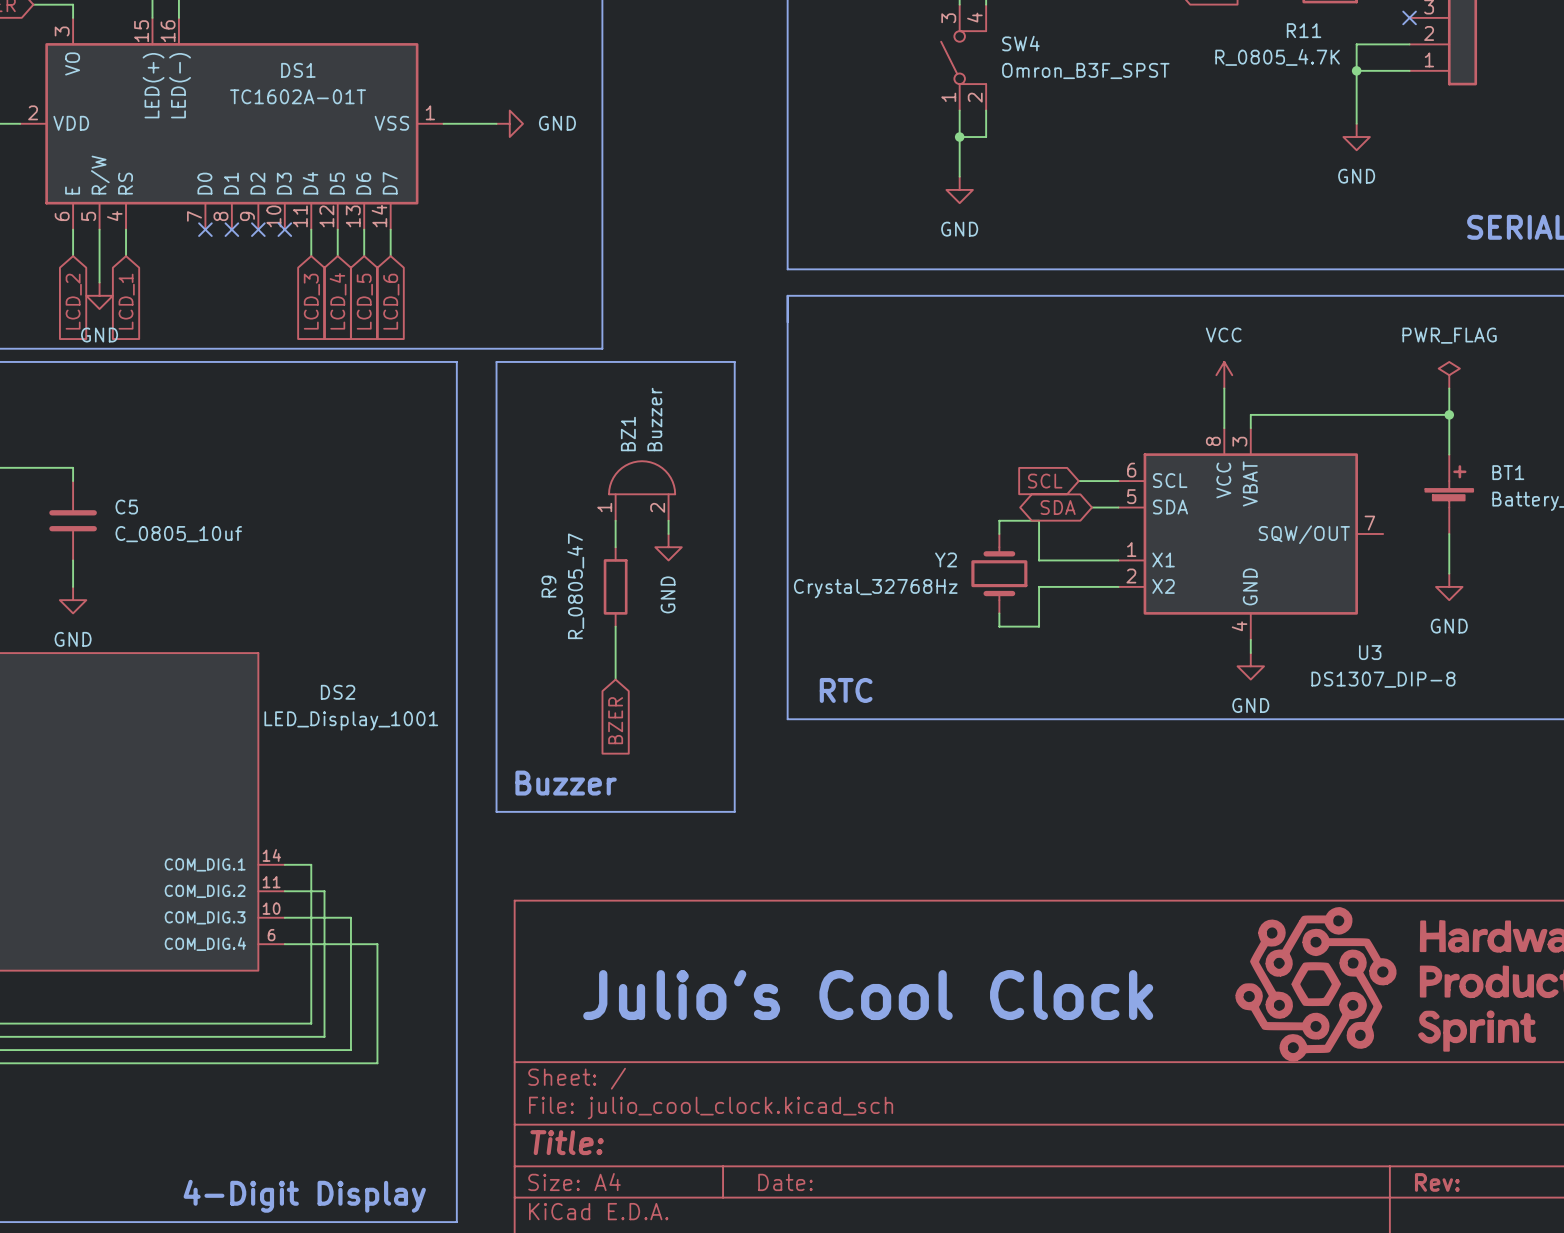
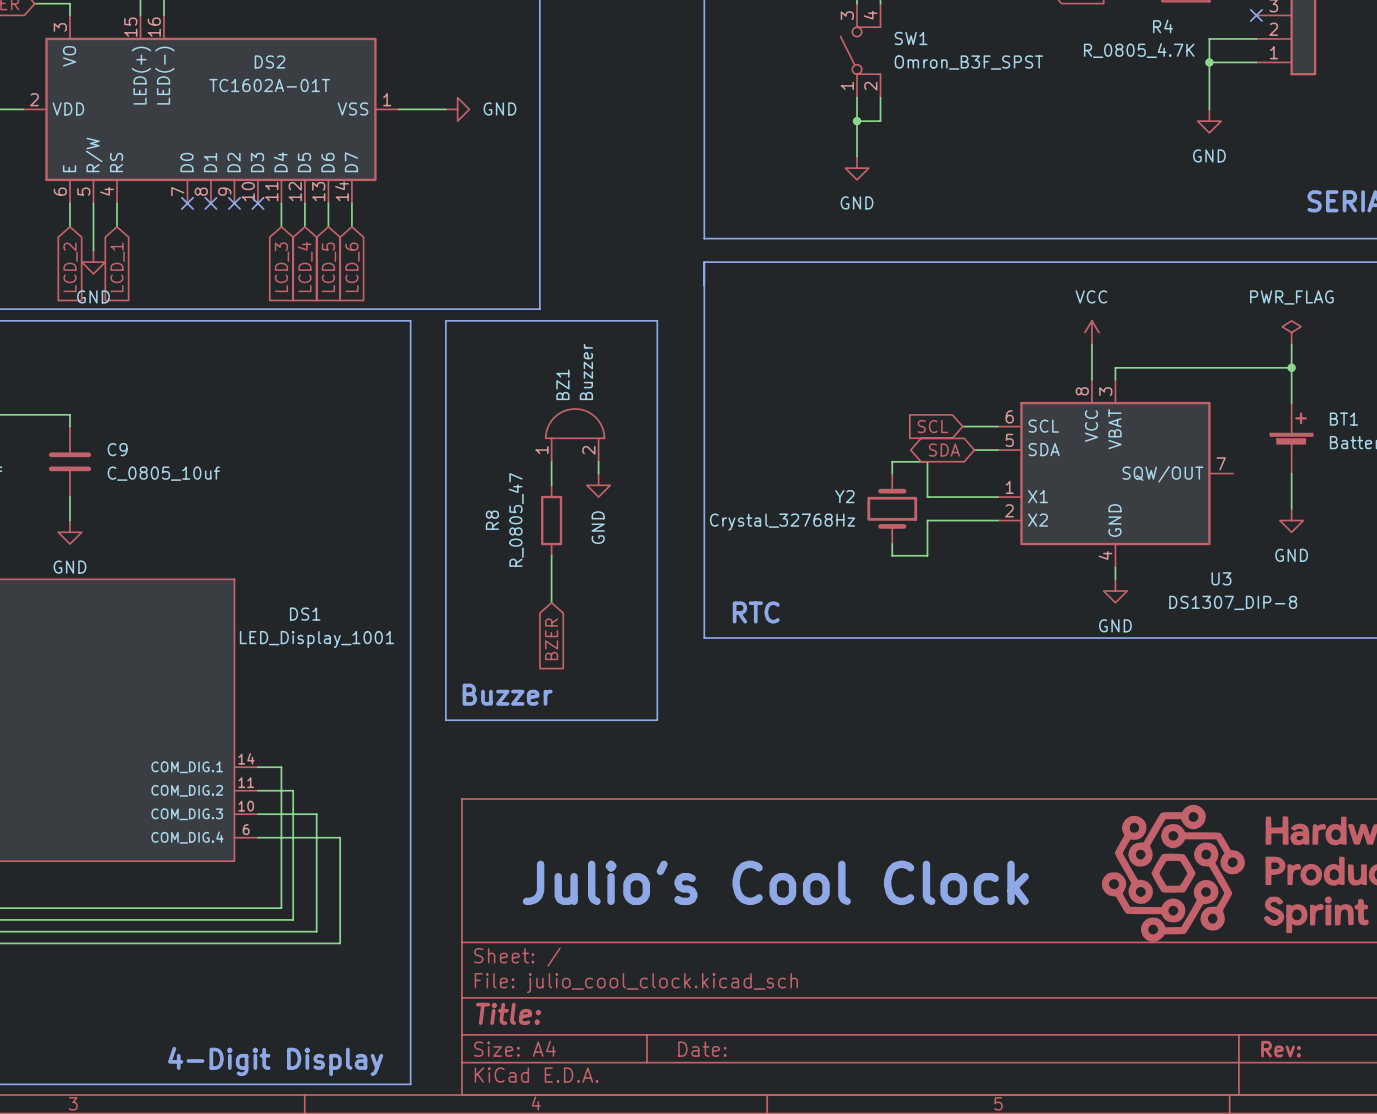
R11 name: R11 (1304, 30) -> R4 (1162, 26)
SW4 name: SW4 (1020, 43) -> SW1 (911, 38)
DS1 name: DS1 (298, 70) -> DS2 (269, 61)
C5 name: C5 (126, 507) -> C9 (117, 449)
R9 name: R9 (548, 586) -> R8 (492, 520)
DS2 name: DS2 (338, 692) -> DS1 (305, 614)

